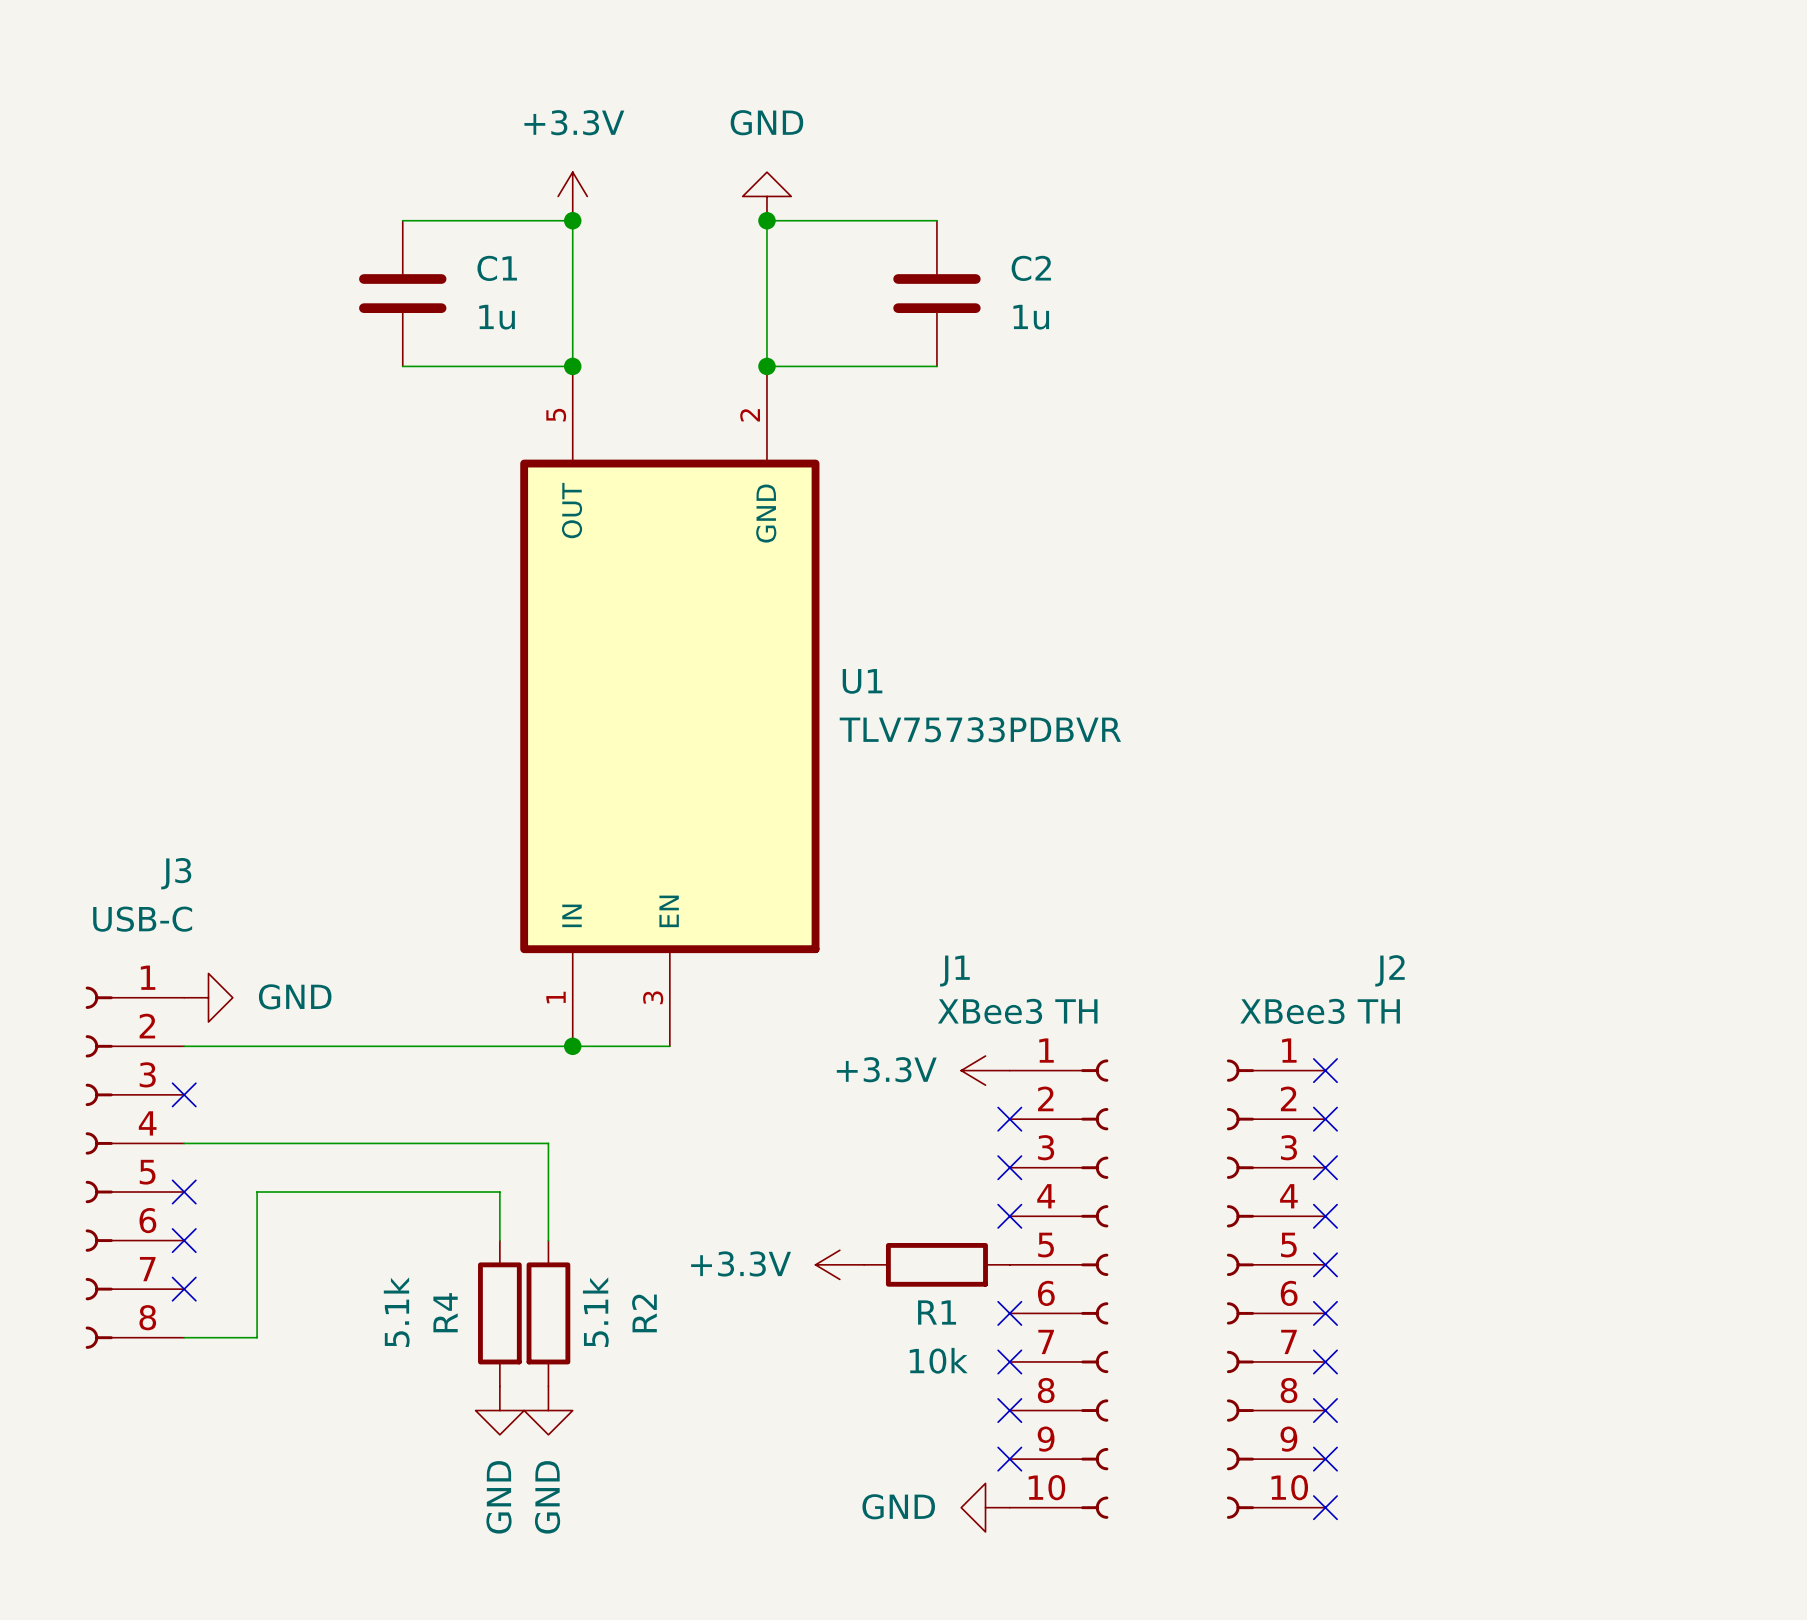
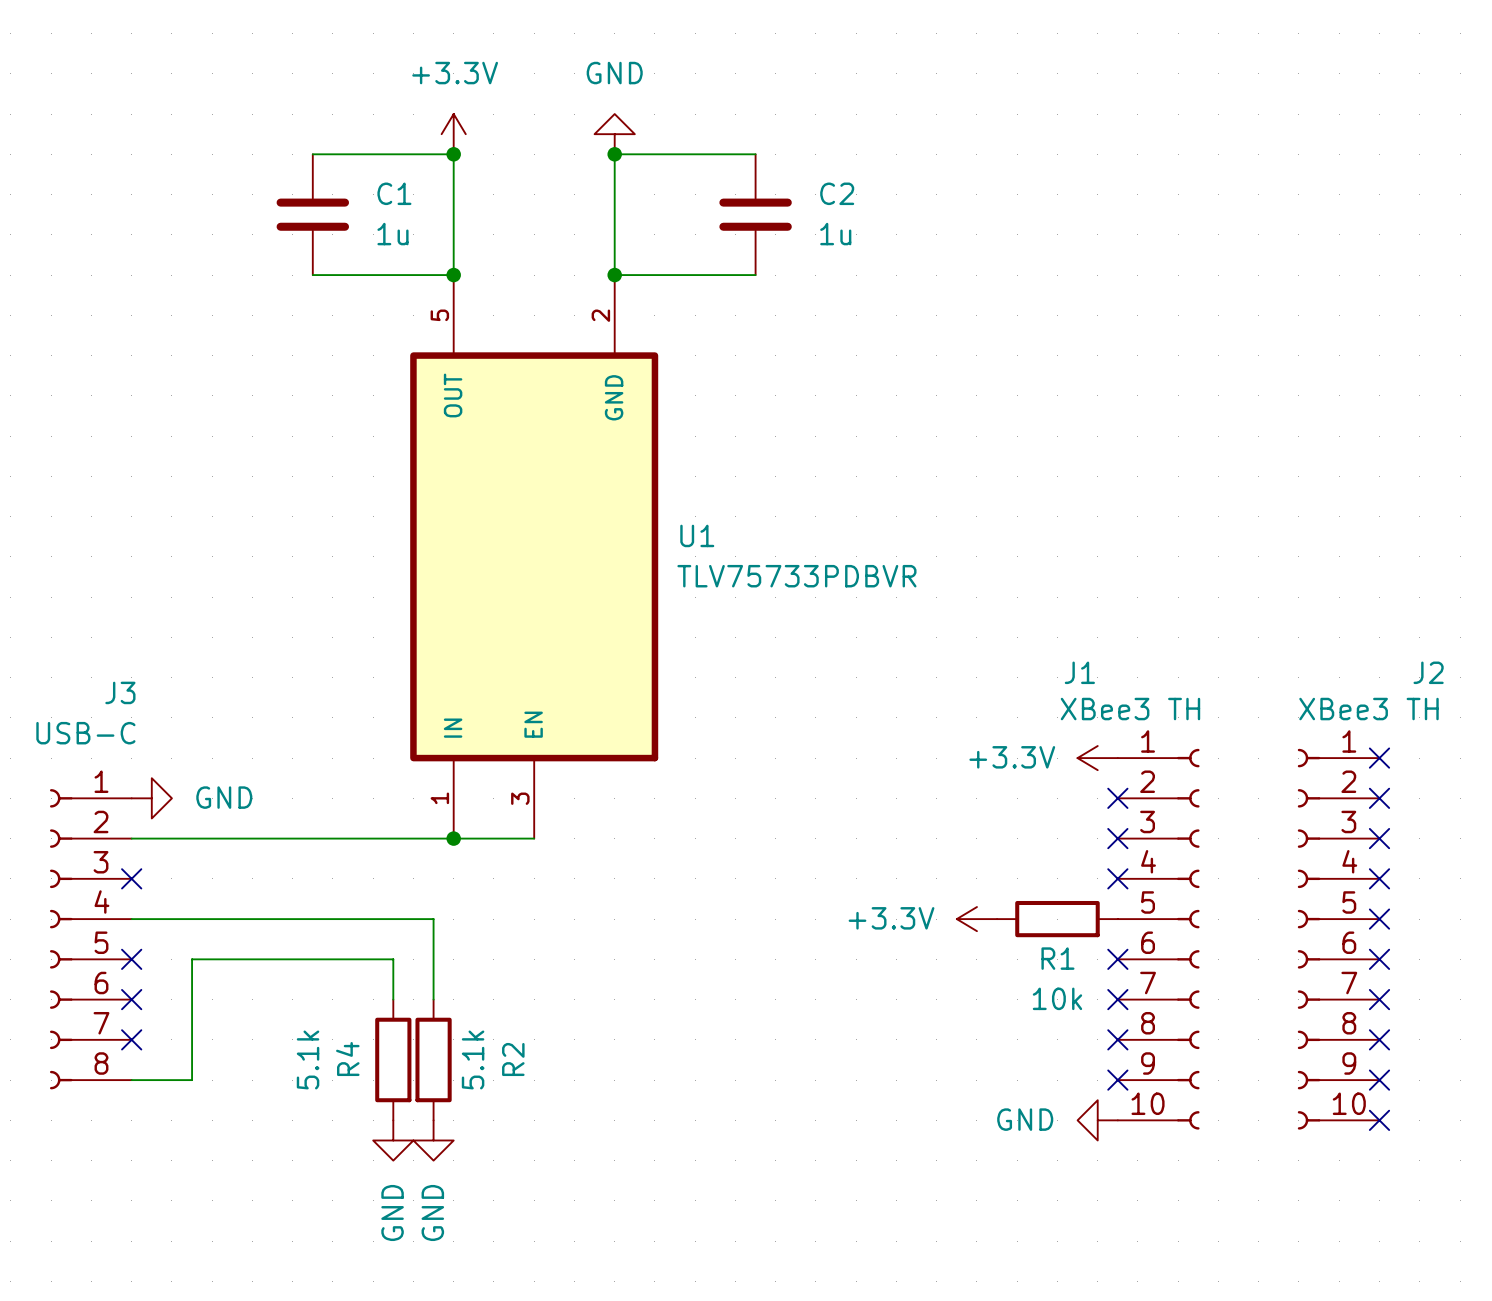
power symbol: none -> +3.3V (1097, 758)
no-connect mark: none -> (1379, 758)
no-connect mark: none -> (1117, 798)
no-connect mark: none -> (1379, 798)
no-connect mark: none -> (1117, 838)
no-connect mark: none -> (1379, 838)
power symbol: +3.3V (985, 1070) -> none
no-connect mark: (1325, 1070) -> none
no-connect mark: none -> (1117, 878)
no-connect mark: none -> (1379, 878)
no-connect mark: (1009, 1119) -> none
no-connect mark: (1325, 1119) -> none
power symbol: none -> +3.3V (976, 919)
no-connect mark: none -> (1379, 919)
no-connect mark: (1009, 1167) -> none
no-connect mark: (1325, 1167) -> none
no-connect mark: none -> (1117, 959)
no-connect mark: none -> (1379, 959)
no-connect mark: (1009, 1216) -> none
no-connect mark: (1325, 1216) -> none
no-connect mark: none -> (1117, 999)
no-connect mark: none -> (1379, 999)
power symbol: +3.3V (839, 1264) -> none
R1 position: (936, 1264) -> (1057, 919)
no-connect mark: (1325, 1264) -> none
J1 position: (1059, 1289) -> (1158, 939)
J2 position: (1276, 1289) -> (1338, 939)
no-connect mark: none -> (1117, 1039)
no-connect mark: none -> (1379, 1039)
no-connect mark: (1009, 1313) -> none
no-connect mark: (1325, 1313) -> none
no-connect mark: none -> (1117, 1080)
no-connect mark: none -> (1379, 1080)
no-connect mark: (1009, 1361) -> none
no-connect mark: (1325, 1361) -> none
no-connect mark: none -> (1379, 1120)
no-connect mark: (1009, 1410) -> none
no-connect mark: (1325, 1410) -> none
no-connect mark: (1009, 1459) -> none
no-connect mark: (1325, 1459) -> none
power symbol position: GND (985, 1507) -> GND (1097, 1120)
no-connect mark: (1325, 1507) -> none

